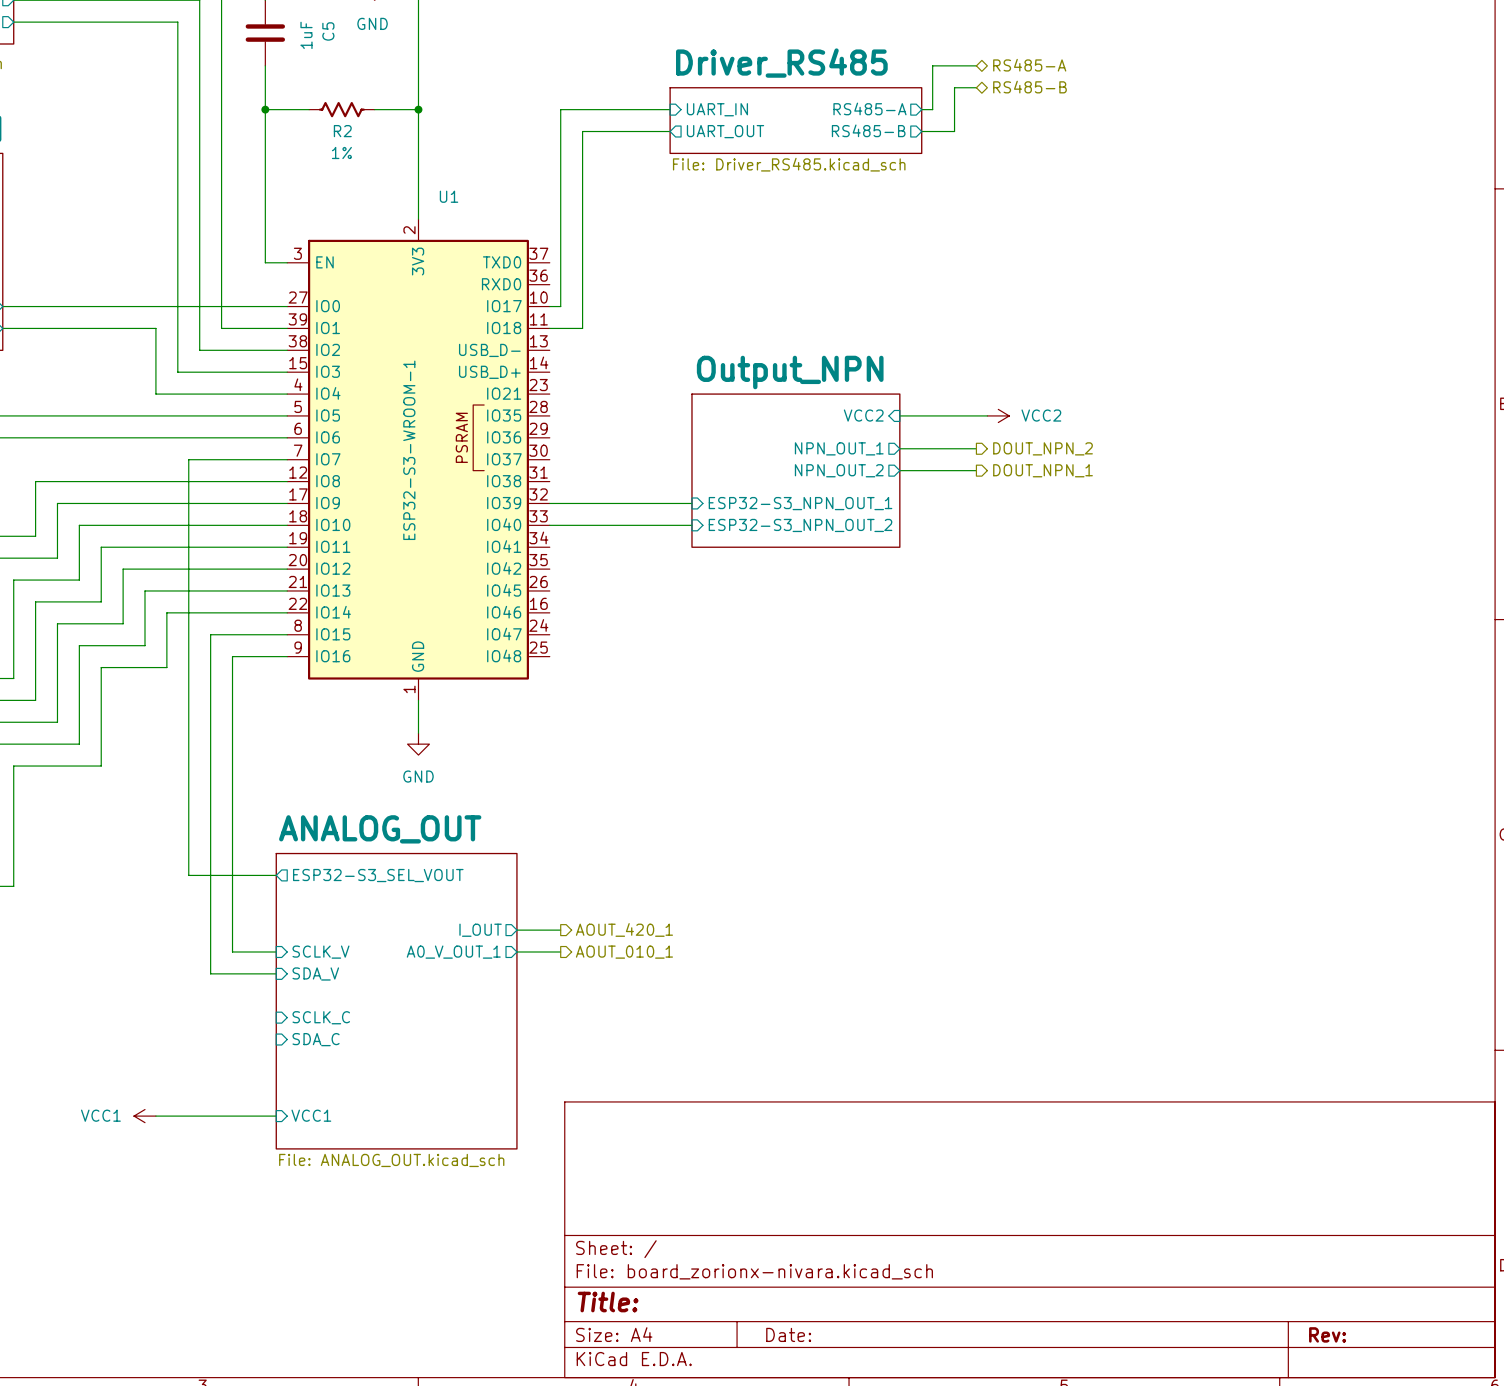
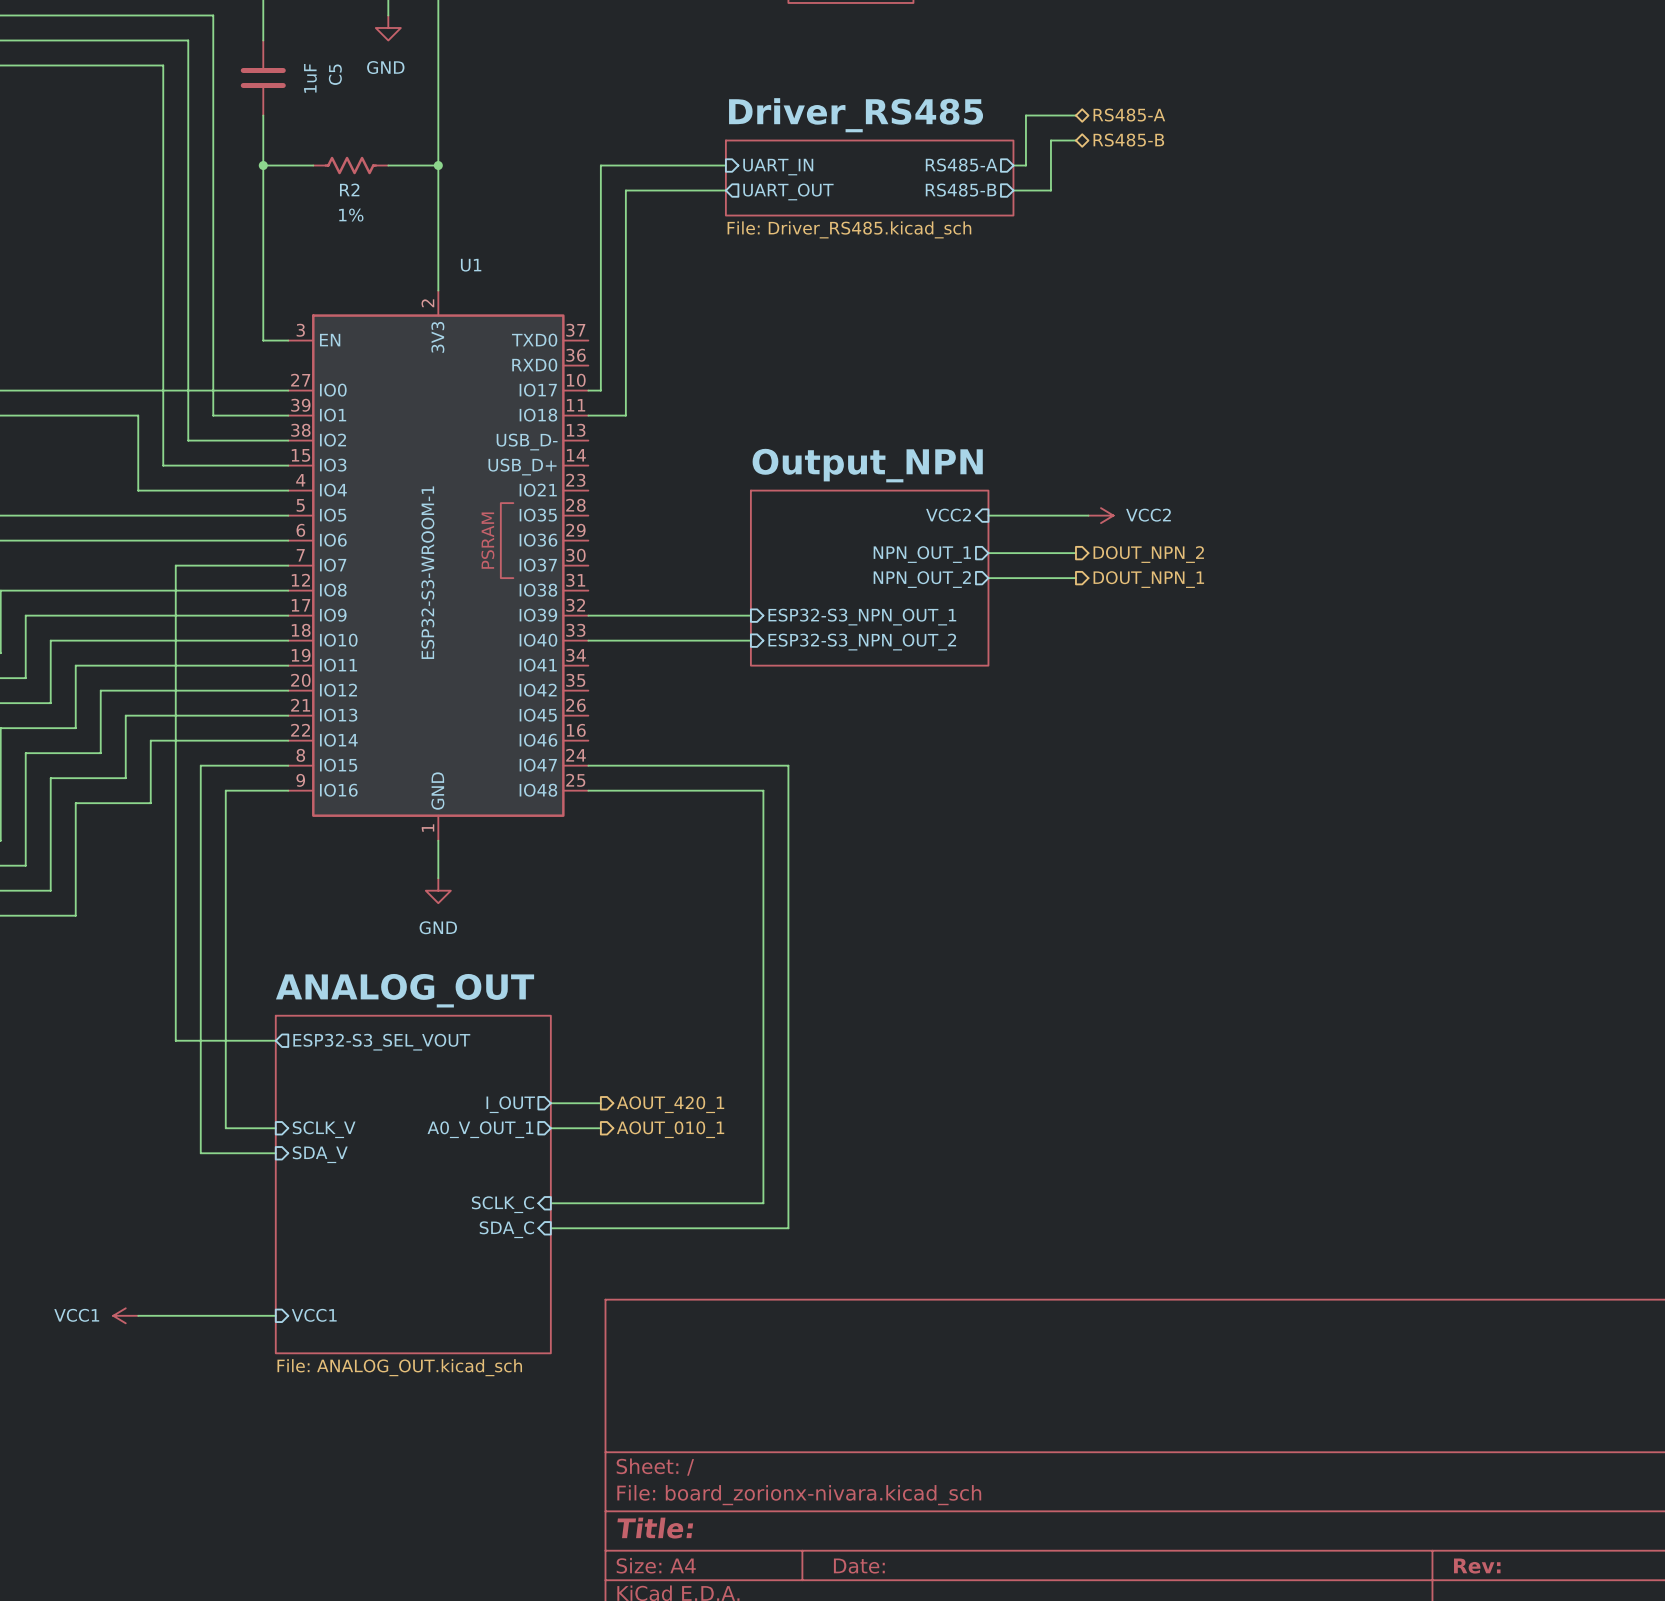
wire: none -> (588, 765) (788, 765) (788, 1228) (550, 1228)
wire: none -> (588, 790) (763, 790) (763, 1203) (550, 1203)
sheet pin rotation: 0° (321, 1017) -> 180° (502, 1204)
sheet pin position: SCLK_C (321, 1017) -> SCLK_C (502, 1204)
sheet pin rotation: 0° (316, 1039) -> 180° (506, 1229)
sheet pin position: SDA_C (316, 1039) -> SDA_C (506, 1229)

